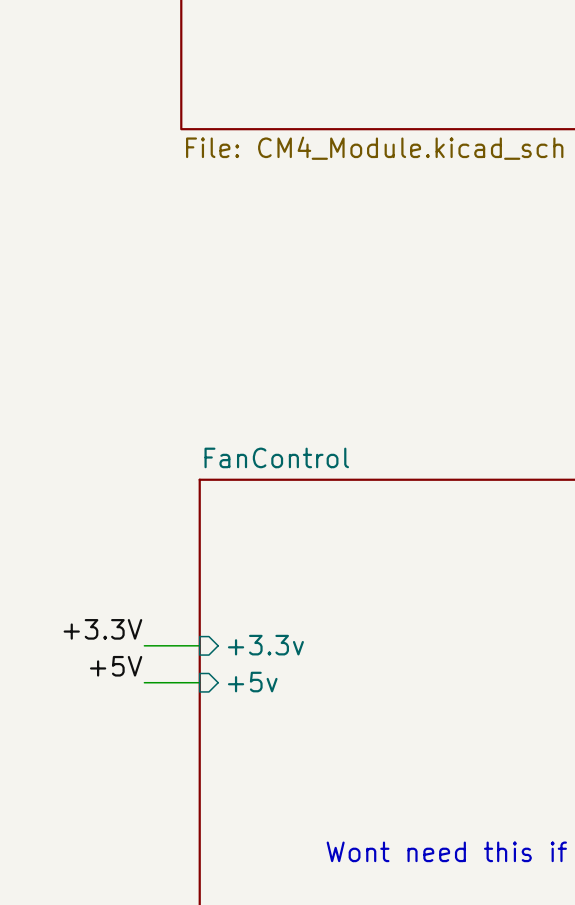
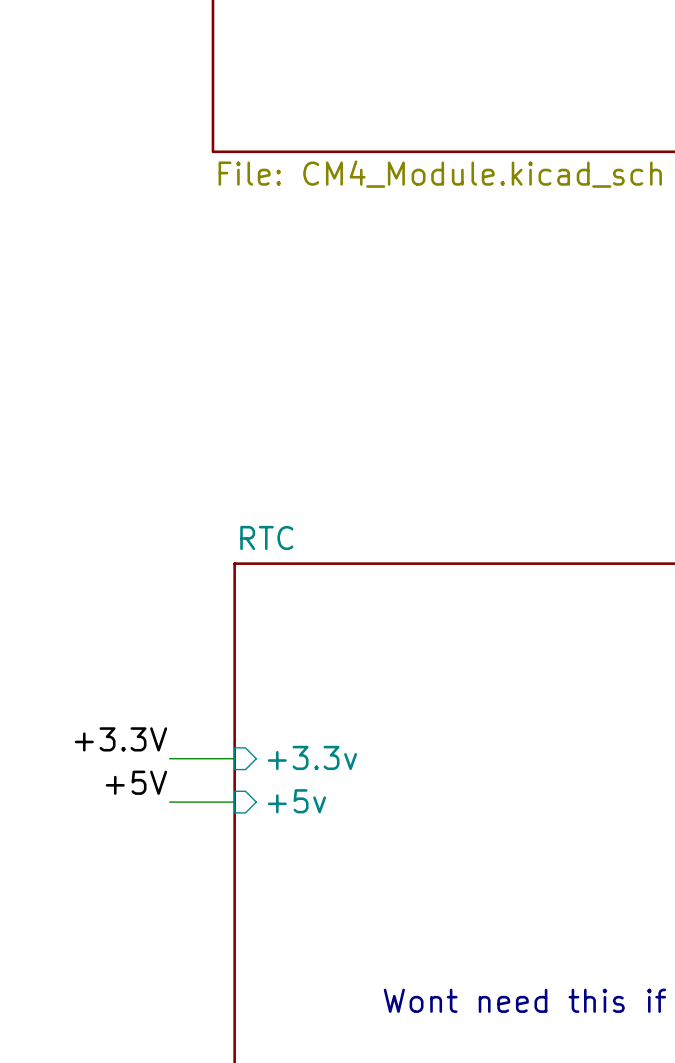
sheet FanControl name: FanControl (276, 457) -> RTC (266, 538)

